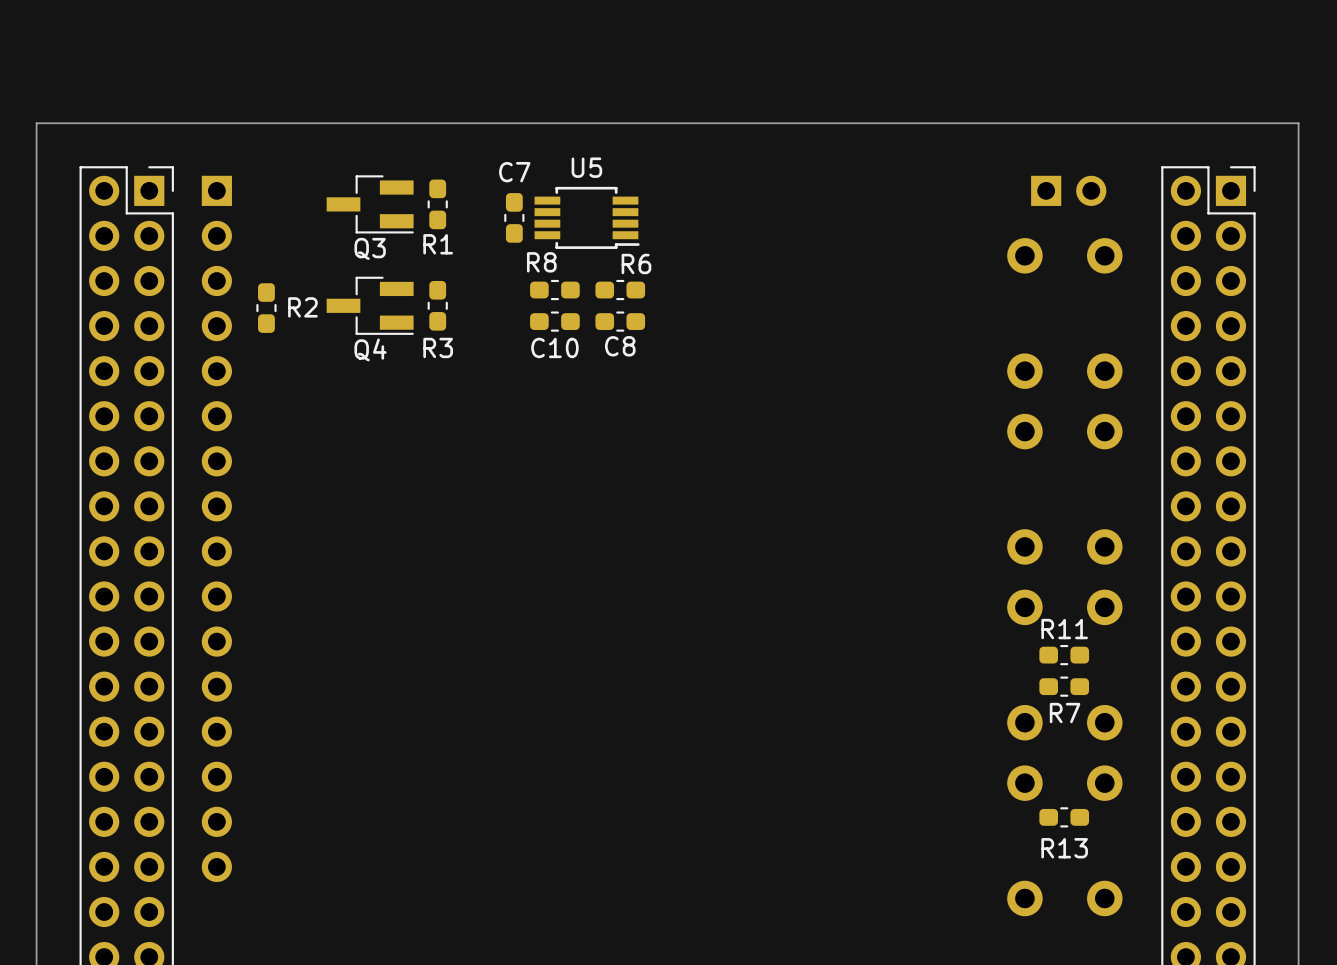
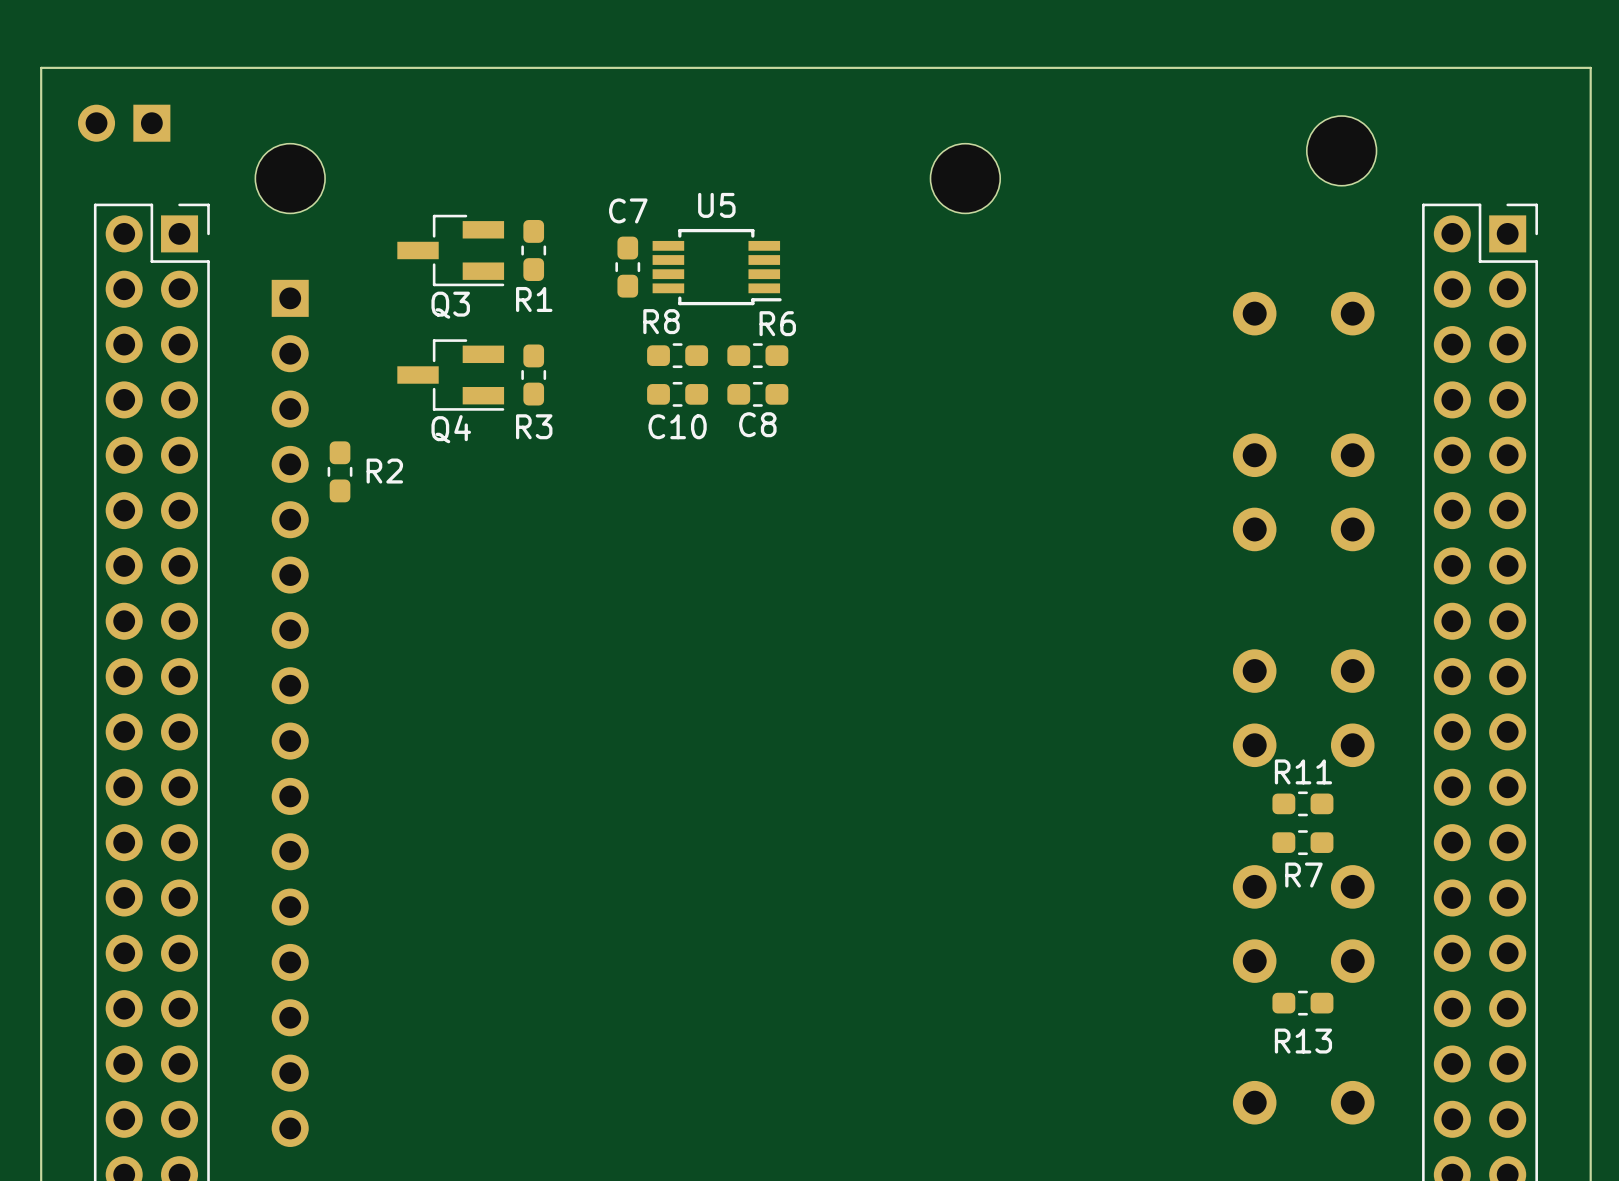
part: none -> (124, 123)
part: none -> (1341, 150)
board edge: (1298, 123) (36, 123) -> (1590, 150) (1590, 67) (41, 67) (41, 150)
part: none -> (290, 178)
part: none -> (965, 178)
part: (1068, 190) -> none
R2 position: (266, 308) -> (340, 471)
part position: (216, 528) -> (290, 713)

